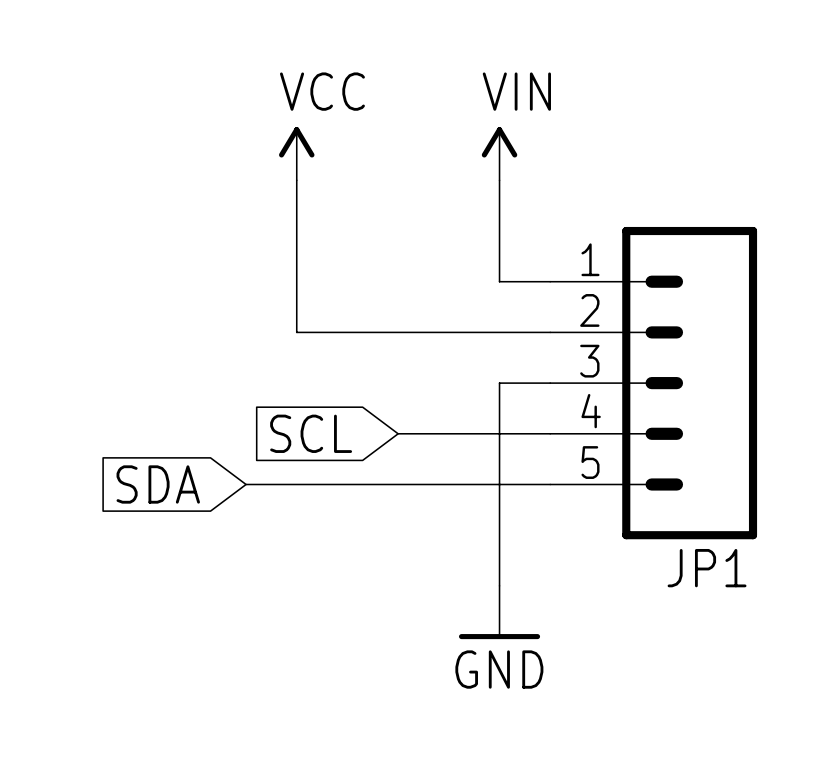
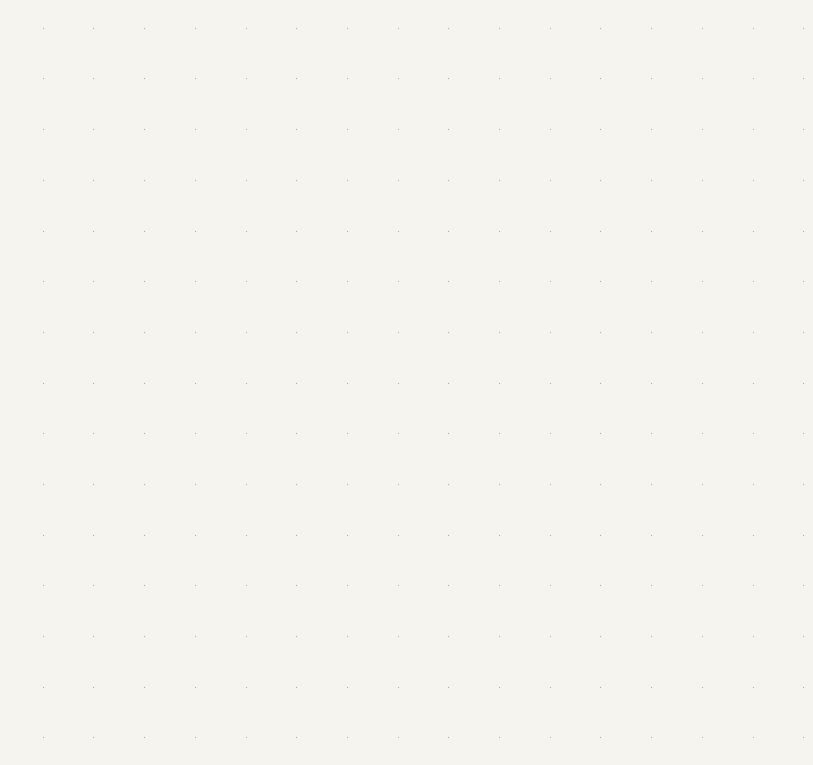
power symbol: VCC (296, 153) -> none
power symbol: VIN (499, 153) -> none
wire: (296, 180) (296, 332) (550, 332) -> none
wire: (499, 180) (499, 281) (550, 281) -> none
wire: (550, 383) (499, 383) (499, 585) -> none
JP1: (653, 383) -> none
global label: SCL (311, 433) -> none
wire: (398, 433) (550, 433) -> none
global label: SDA (158, 484) -> none
wire: (246, 484) (550, 484) -> none
power symbol: GND (499, 612) -> none

